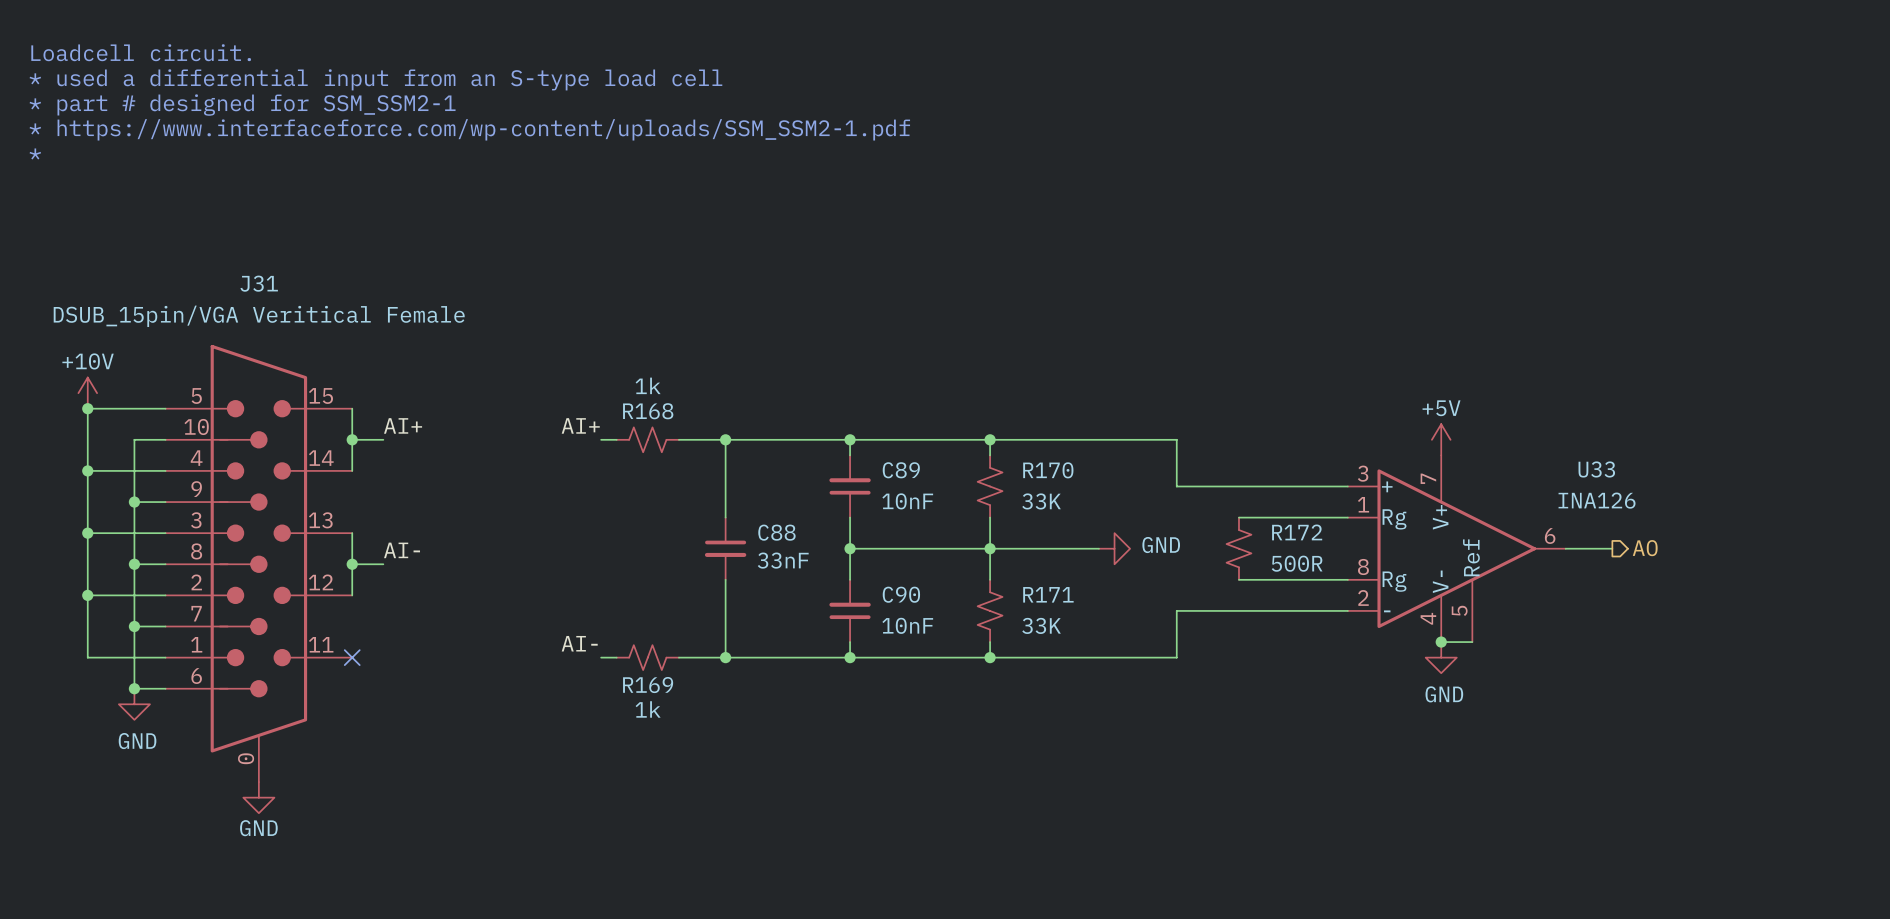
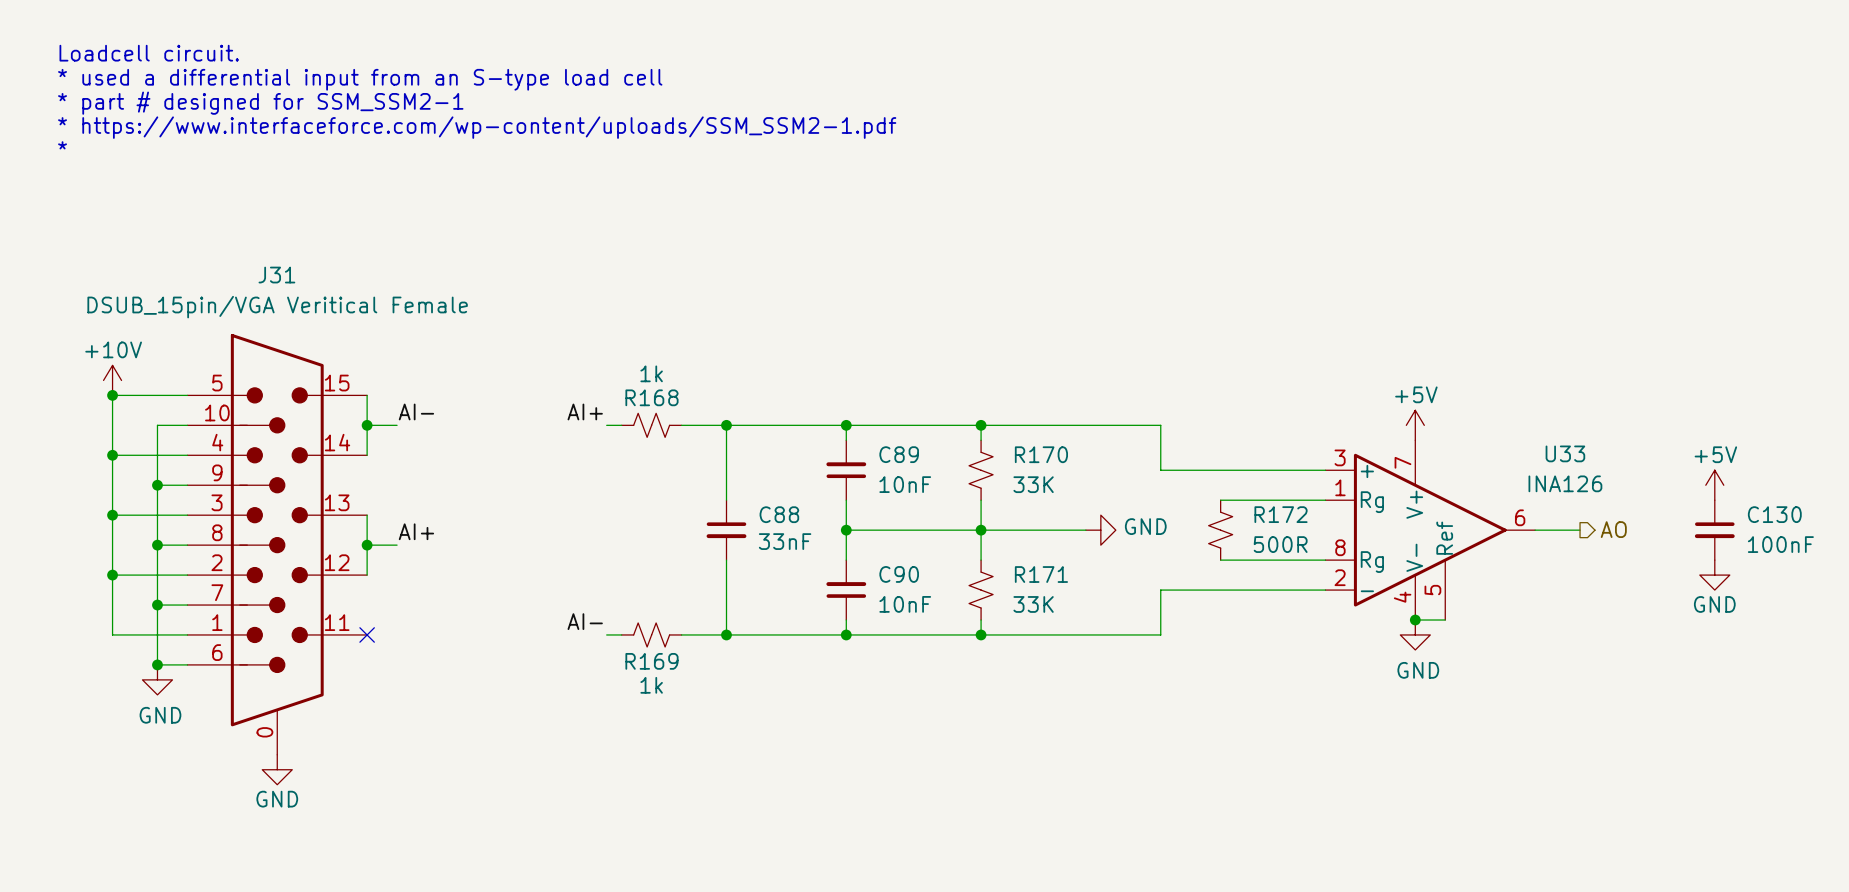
label: AI+ (403, 425) -> AI- (416, 411)
power symbol: none -> +5V (1714, 485)
C130: none -> 100nF (1714, 530)
label: AI- (402, 550) -> AI+ (416, 531)
power symbol: none -> GND (1714, 575)

